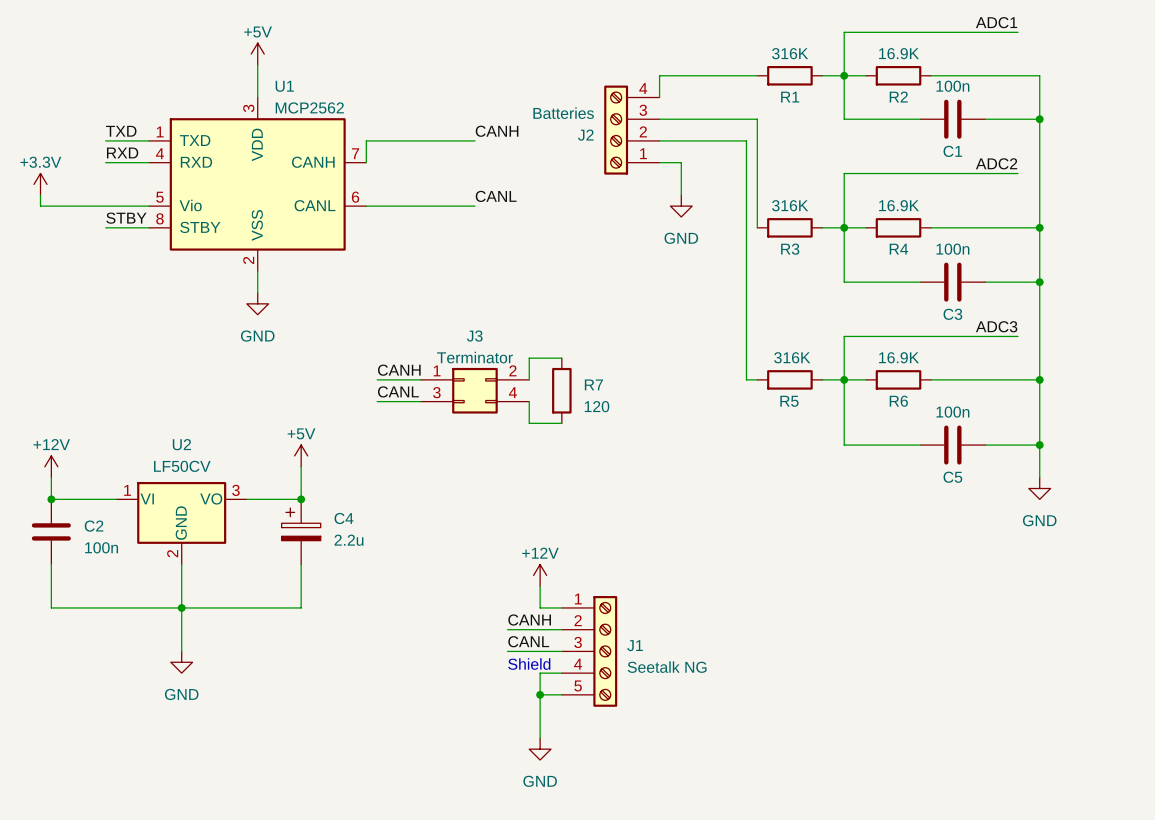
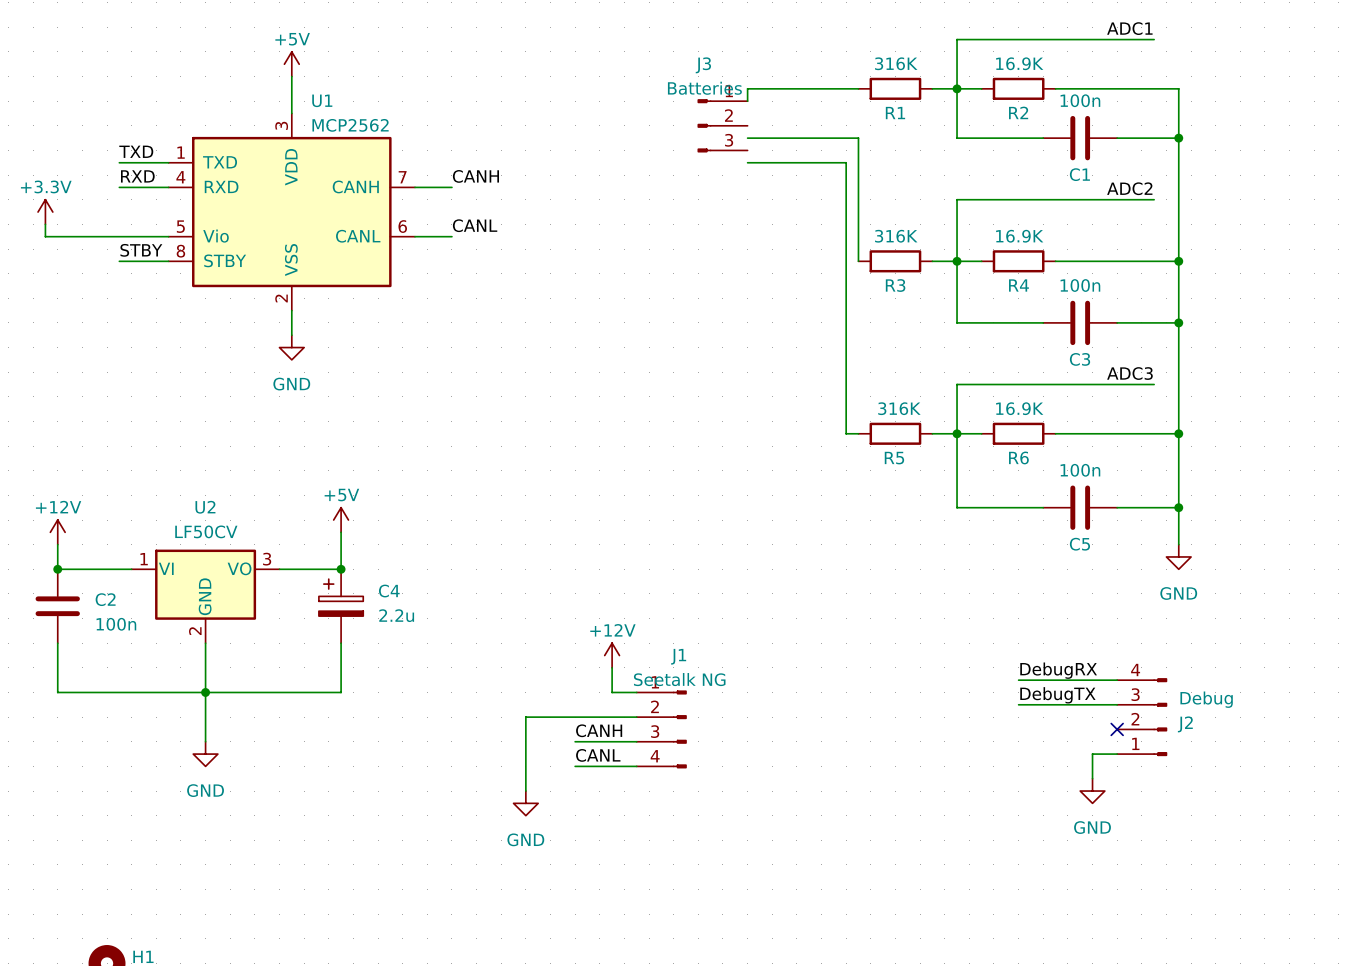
J2 symbol: [604, 85, 660, 175] -> [1117, 678, 1168, 757]
wire: (659, 86) (659, 97) -> none
J2 value: Batteries (563, 113) -> Debug (1206, 699)
label position: CANH (497, 131) -> CANH (475, 176)
J2 name position: J2 (585, 135) -> J2 (1185, 724)
wire: (474, 140) (366, 140) (366, 162) -> (451, 187) (414, 187)
wire: (659, 162) (681, 162) (681, 195) -> none
label position: CANL (496, 196) -> CANL (475, 225)
wire: (398, 206) (474, 206) -> none
power symbol: GND (681, 206) -> none
J3 value: Terminator (474, 357) -> Batteries (704, 88)
wire: (561, 358) (529, 358) (529, 379) -> none
J3 symbol: [420, 367, 530, 414] -> [697, 99, 748, 153]
label: CANH (399, 370) -> none
wire: (377, 379) (420, 379) -> none
R7: 120 (561, 390) -> none
label: CANL (398, 391) -> none
wire: (377, 401) (420, 401) -> none
wire: (529, 401) (529, 423) (561, 423) -> none
label: none -> DebugRX (1058, 670)
J1 symbol: [561, 596, 618, 707] -> [636, 690, 687, 769]
wire: none -> (1018, 680) (1117, 680)
label: none -> DebugTX (1057, 695)
wire: none -> (1018, 704) (1117, 704)
label: CANH (529, 620) -> none
wire: none -> (575, 717) (525, 717) (525, 791)
no-connect mark: none -> (1117, 729)
label: CANL (528, 641) -> CANH (599, 730)
J1 name position: J1 (635, 645) -> J1 (678, 656)
wire: none -> (1117, 754) (1092, 754) (1092, 778)
label: none -> CANL (598, 755)
text: Shield (529, 664) -> none
J1 value position: Seetalk NG (667, 667) -> Seetalk NG (679, 679)
wire: (540, 673) (540, 738) -> (612, 766) (575, 766)
wire: (540, 694) (561, 694) -> none
junction: (540, 694) -> none
power symbol: none -> GND (1092, 791)
power symbol position: GND (540, 749) -> GND (525, 803)

